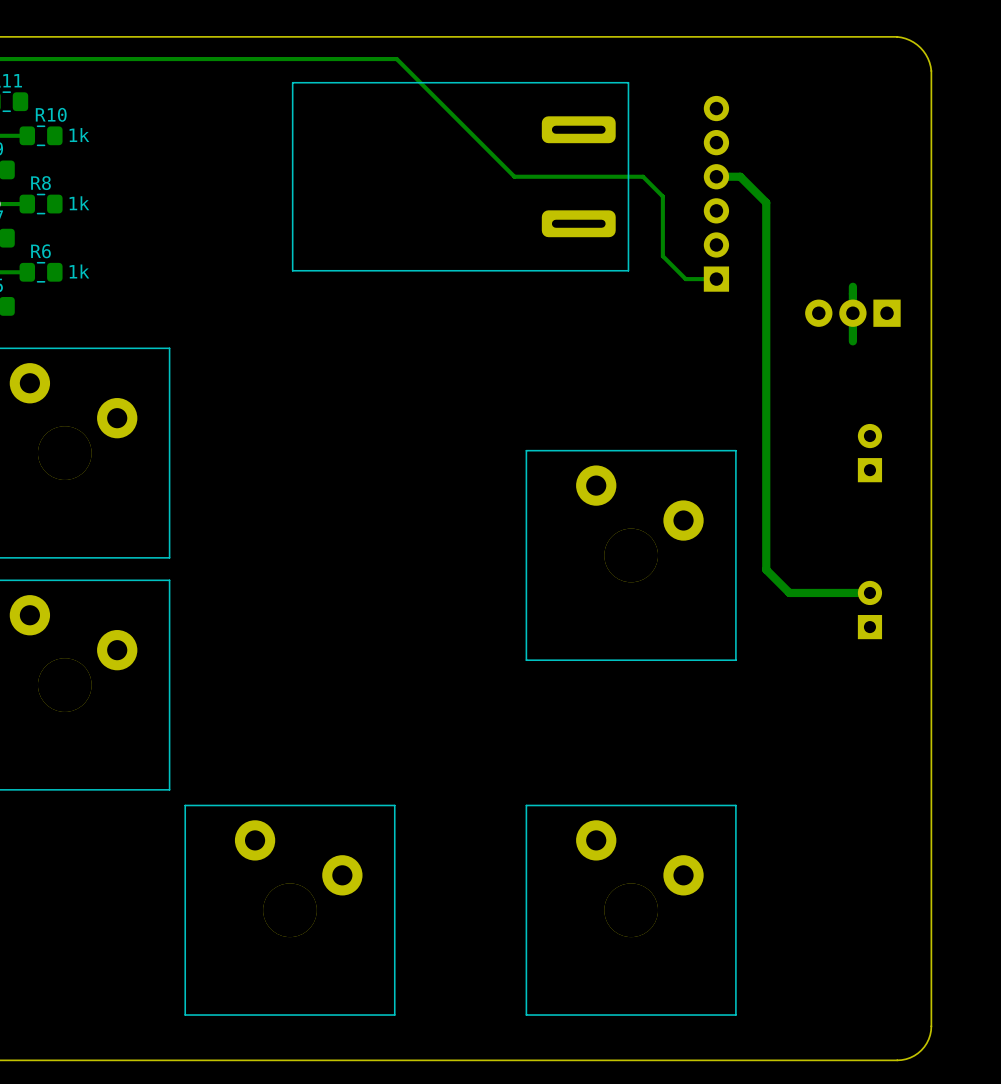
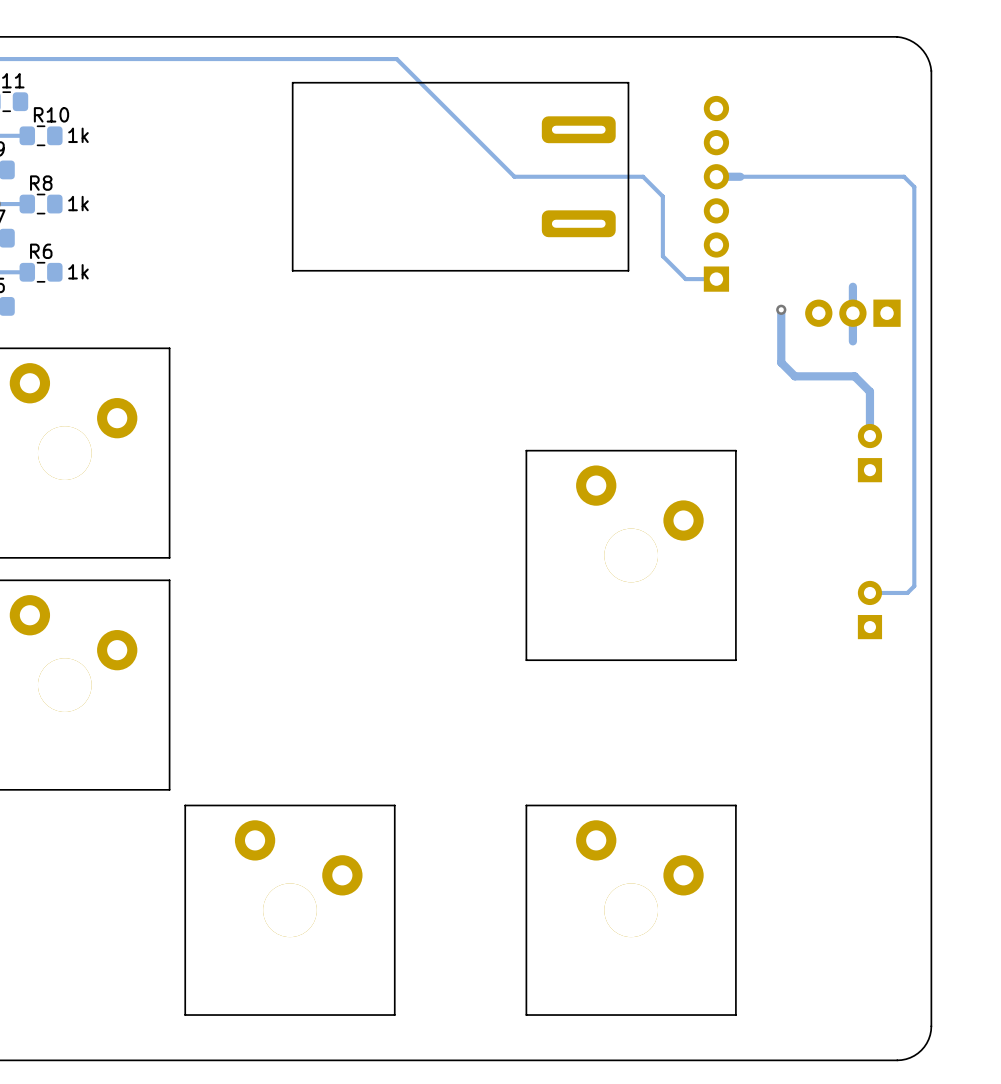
track: (740, 176) (766, 202) (766, 569) (789, 592) (864, 592) -> (740, 176) (904, 176) (914, 186) (914, 586) (907, 592) (869, 592)
track: none -> (781, 309) (781, 362) (794, 376) (854, 376) (869, 391) (869, 436)
via: none -> (781, 309)

